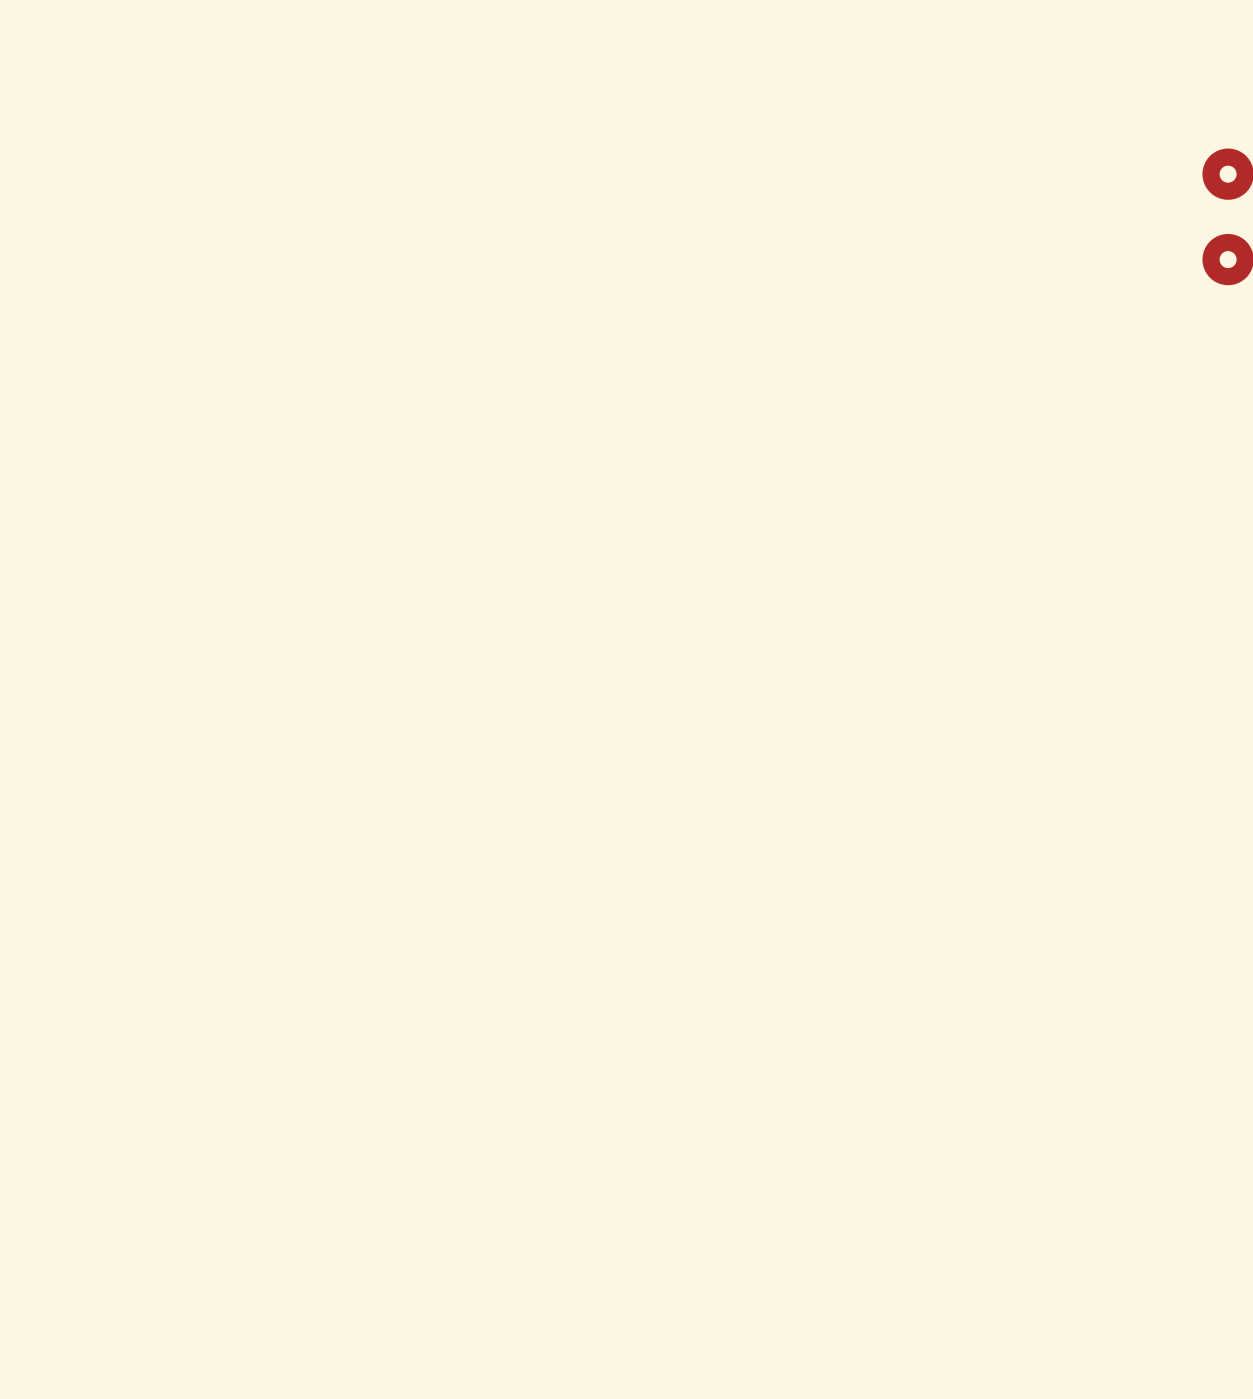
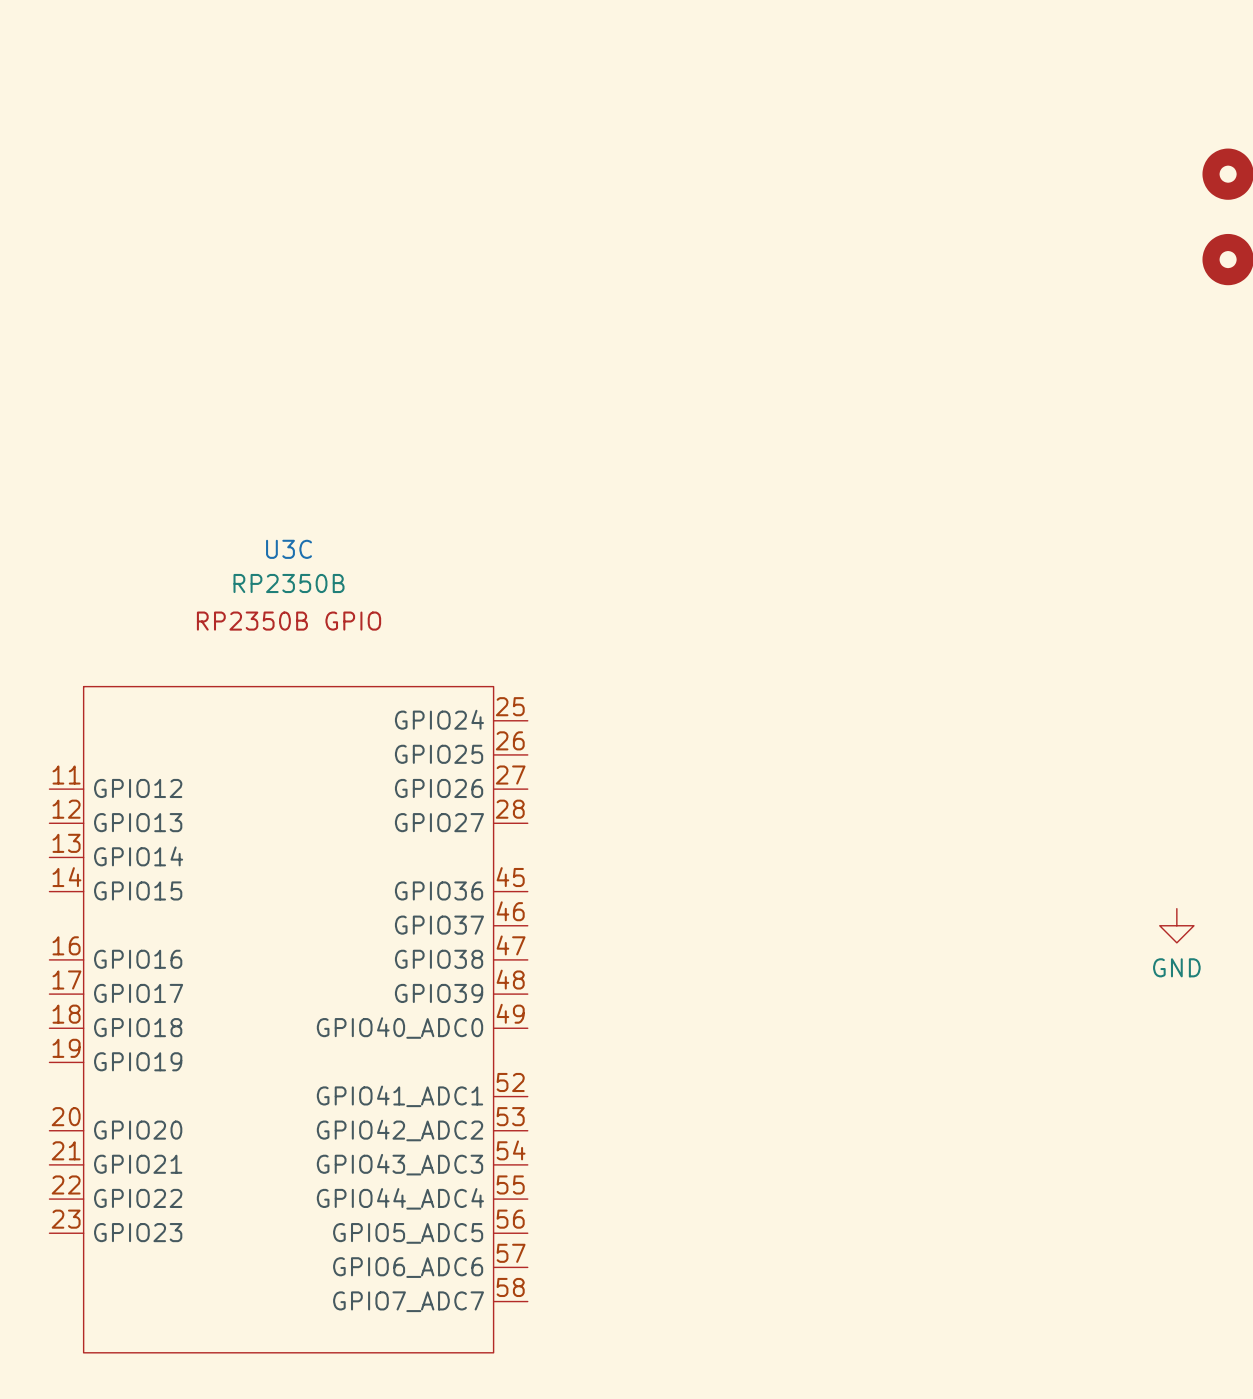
power symbol: none -> GND (1176, 925)
U3C: none -> RP2350B (288, 1019)

